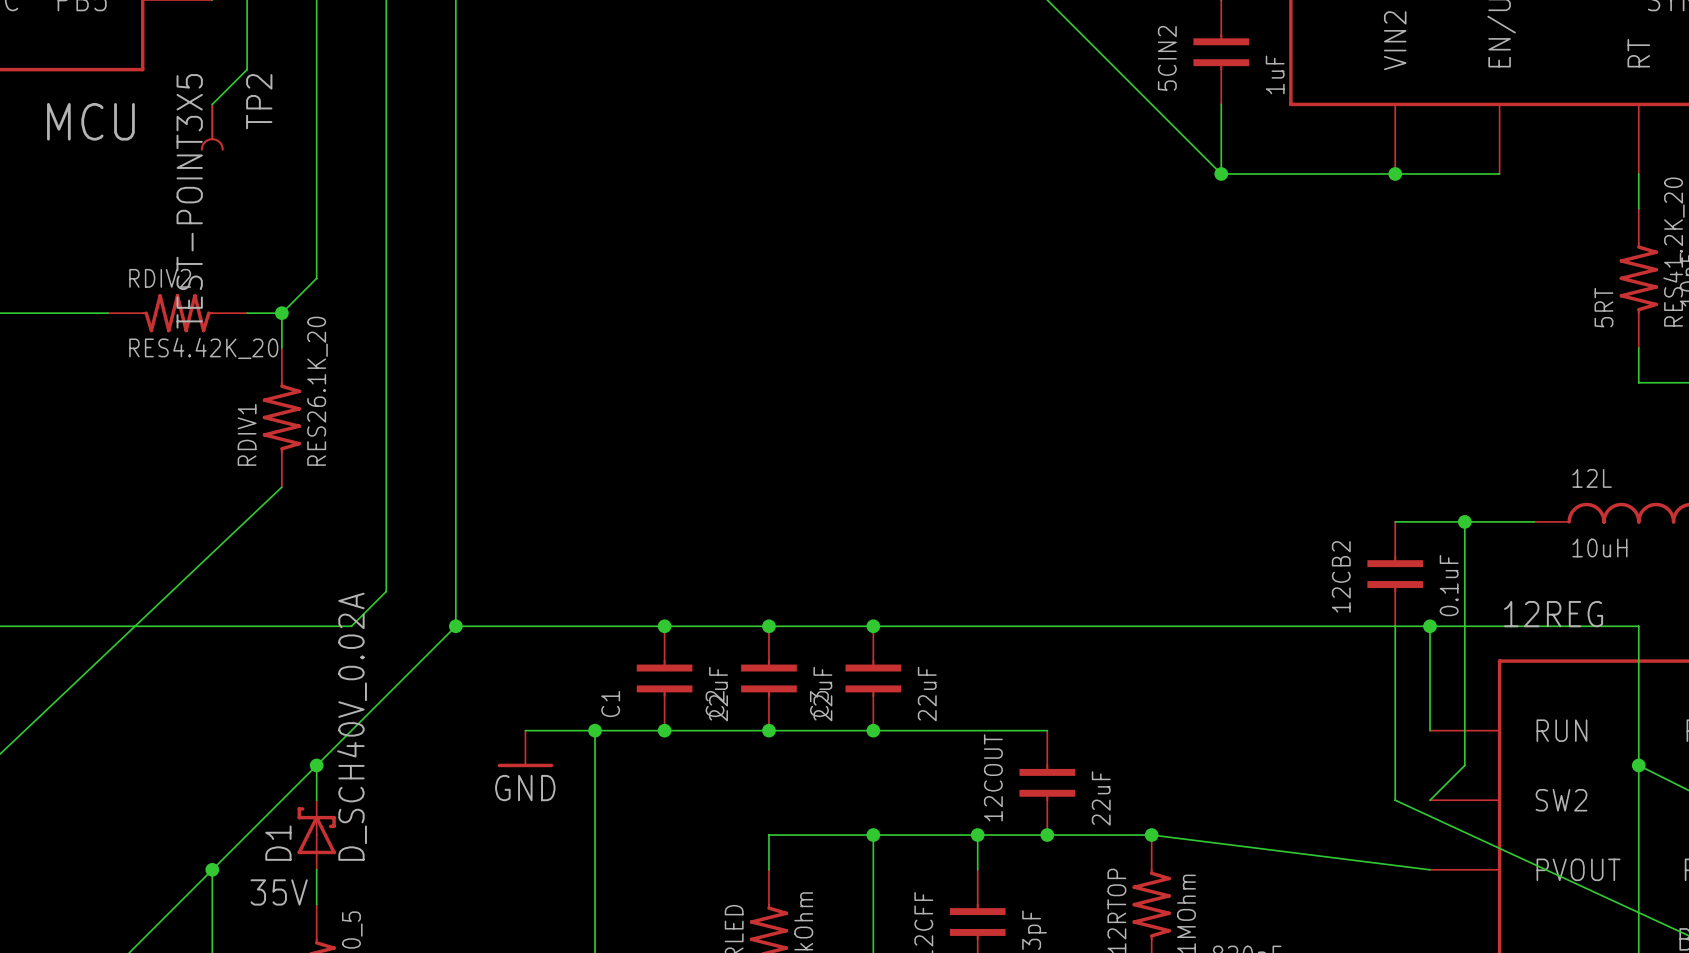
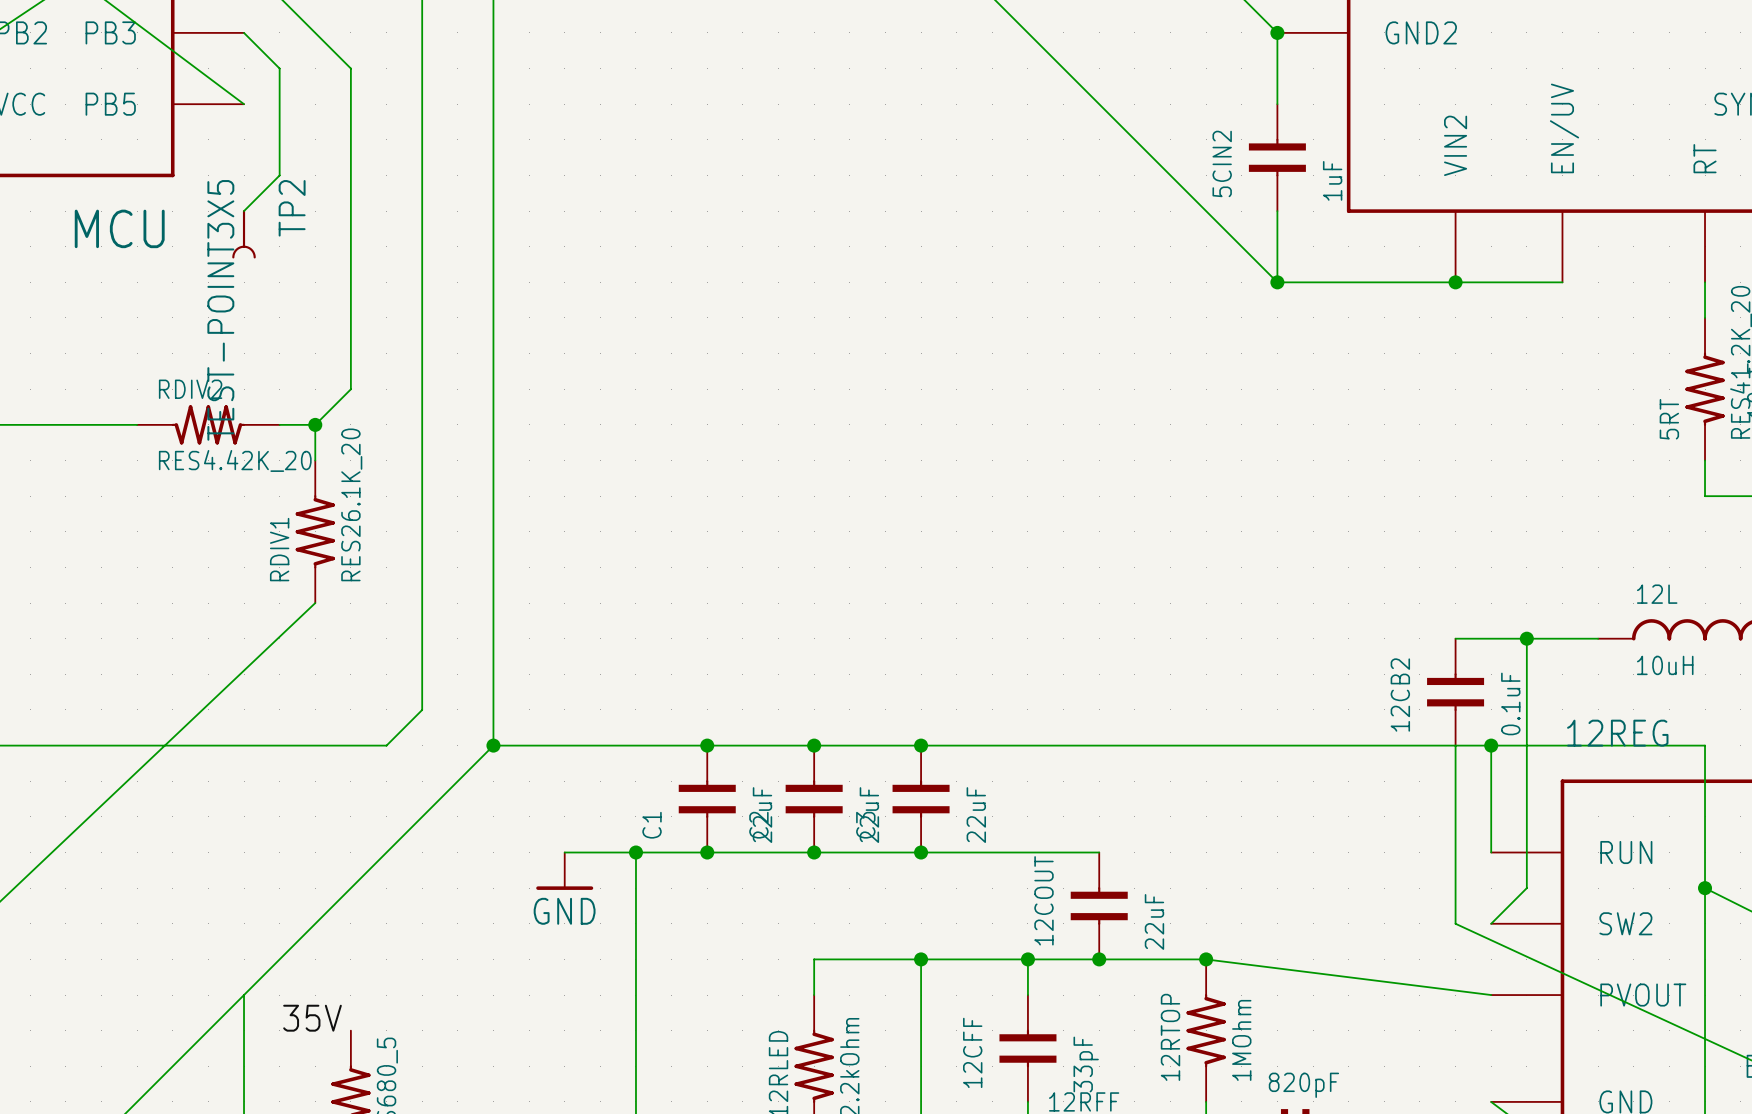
wire: (316, 765) (316, 800) -> none
junction: (316, 765) -> none
D1: D_SCH40V_0.02A (316, 835) -> none
junction: (212, 869) -> none
wire: (316, 869) (316, 904) -> none

